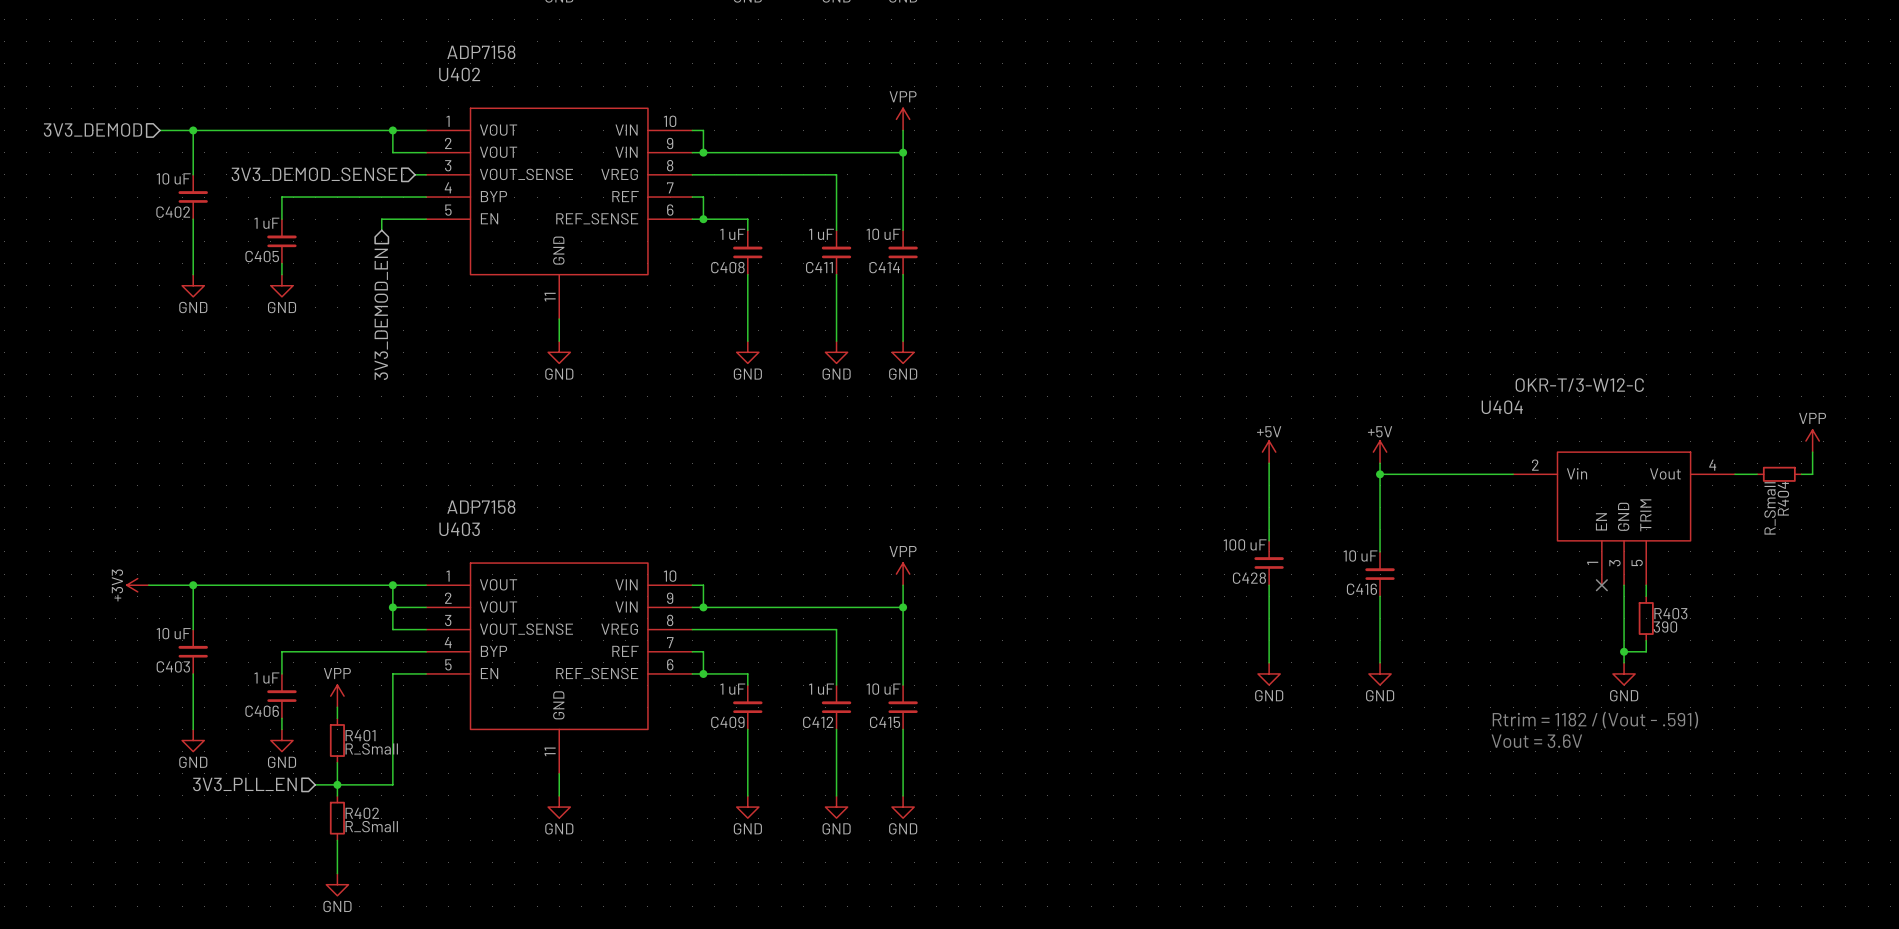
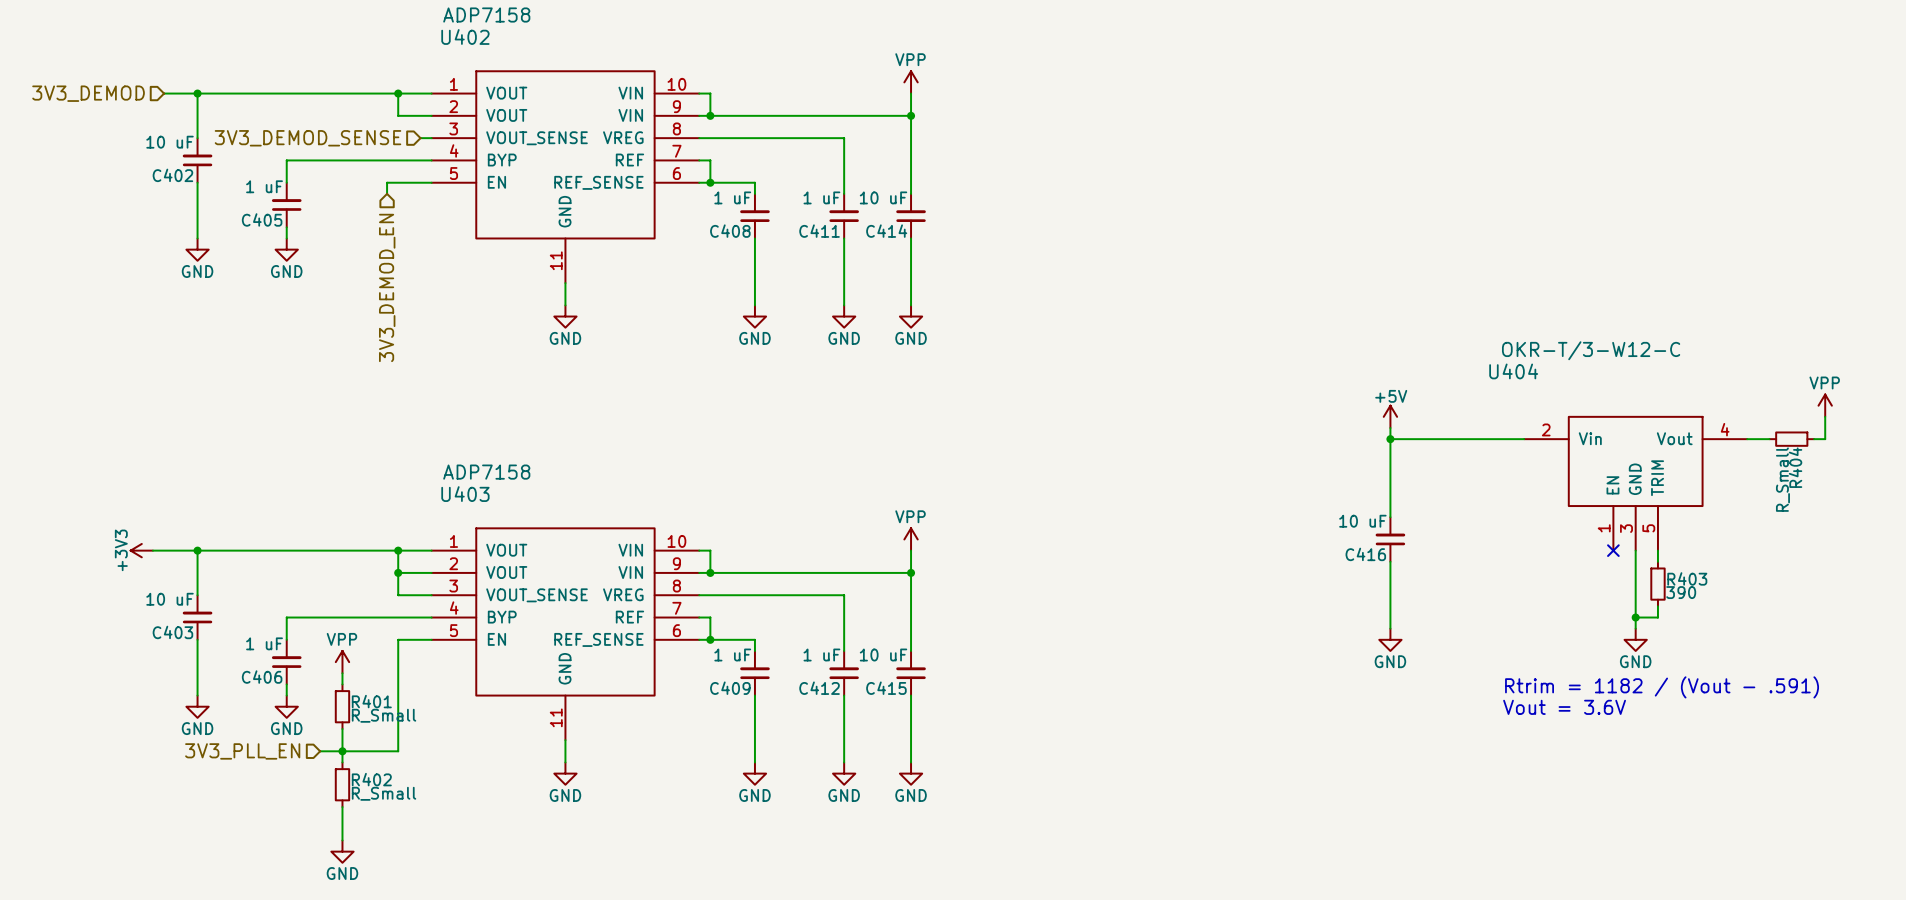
power symbol: +5V (1269, 452) -> none
wire: (1269, 463) (1269, 540) -> none
C428: 100 uF (1269, 563) -> none
wire: (1269, 585) (1269, 662) -> none
power symbol: GND (1269, 673) -> none

